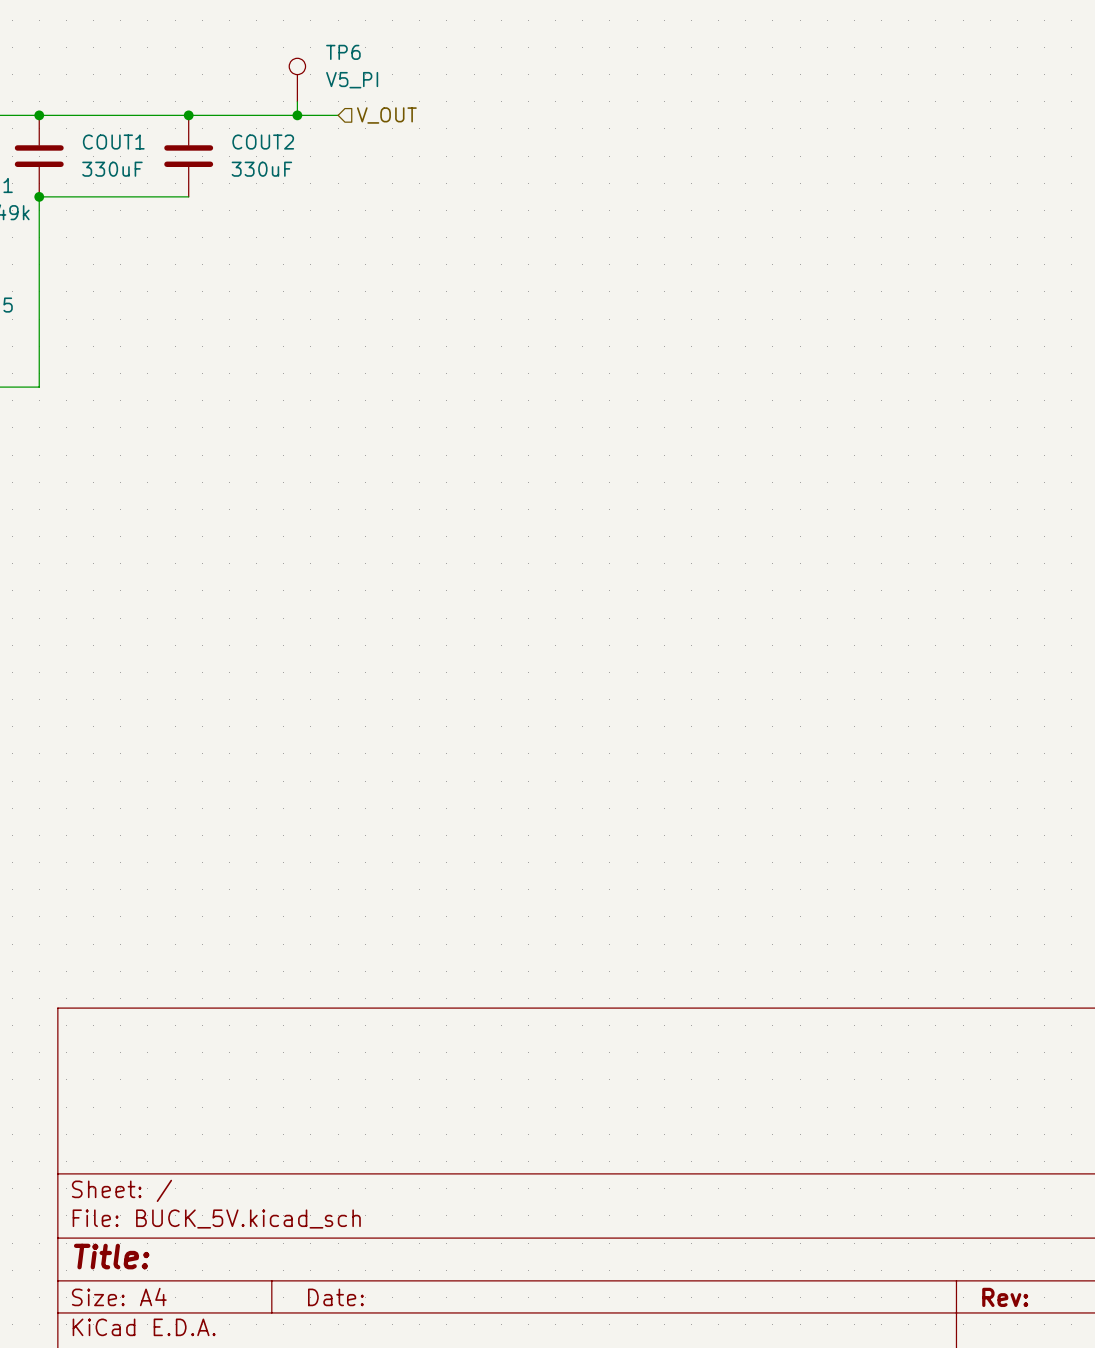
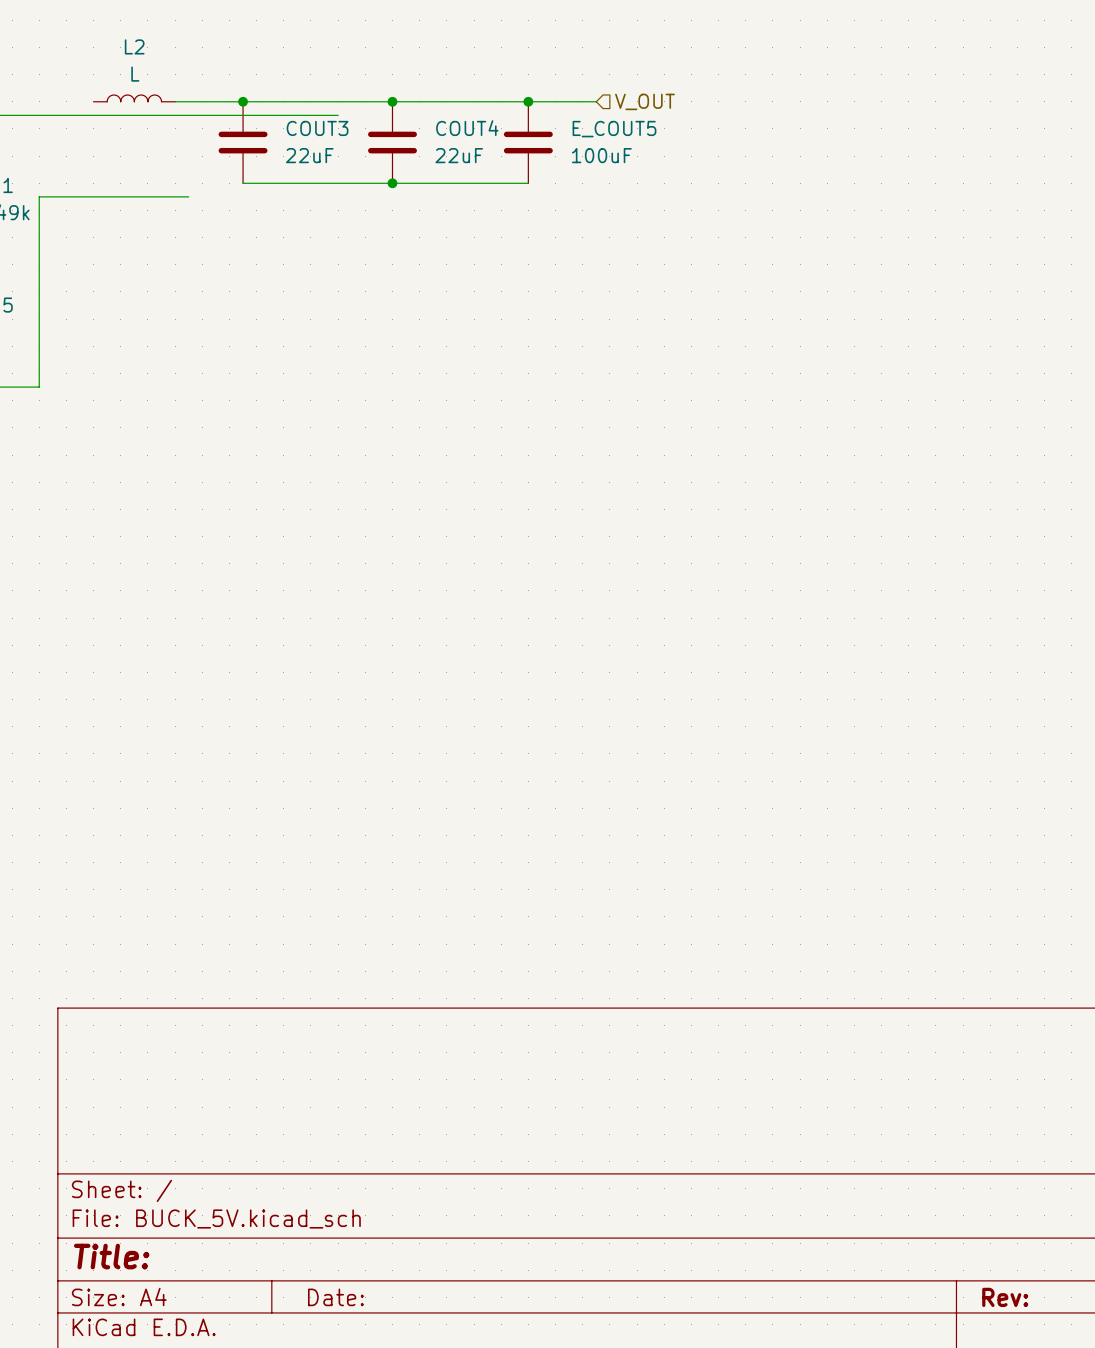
TP6: V5_PI (297, 80) -> none
L2: none -> L (134, 98)
wire: none -> (175, 101) (596, 101)
junction: none -> (243, 101)
wire: (297, 101) (297, 115) -> none
junction: none -> (392, 101)
junction: none -> (528, 101)
junction: (39, 115) -> none
junction: (188, 115) -> none
junction: (297, 115) -> none
hierarchical label position: V_OUT (386, 115) -> V_OUT (645, 101)
COUT3: none -> 22uF (243, 142)
COUT4: none -> 22uF (392, 142)
E_COUT5: none -> 100uF (528, 142)
COUT1: 330uF (39, 156) -> none
COUT2: 330uF (188, 156) -> none
wire: none -> (243, 183) (528, 183)
junction: none -> (392, 183)
junction: (39, 196) -> none

